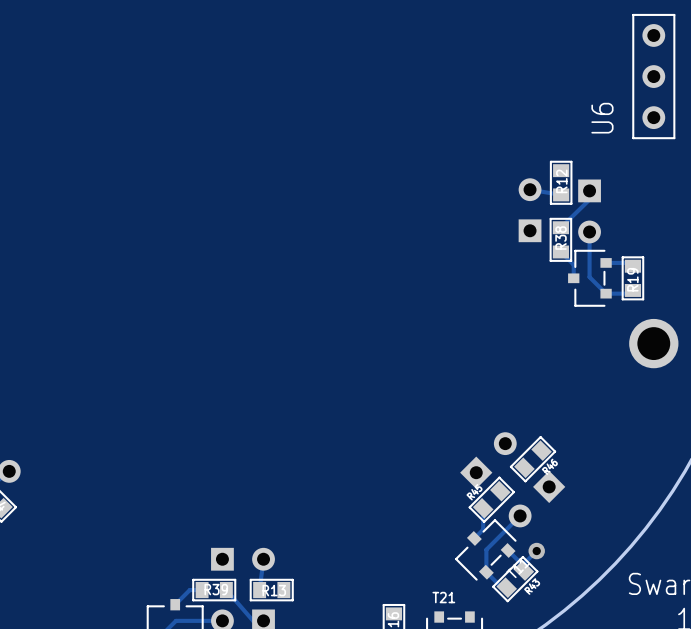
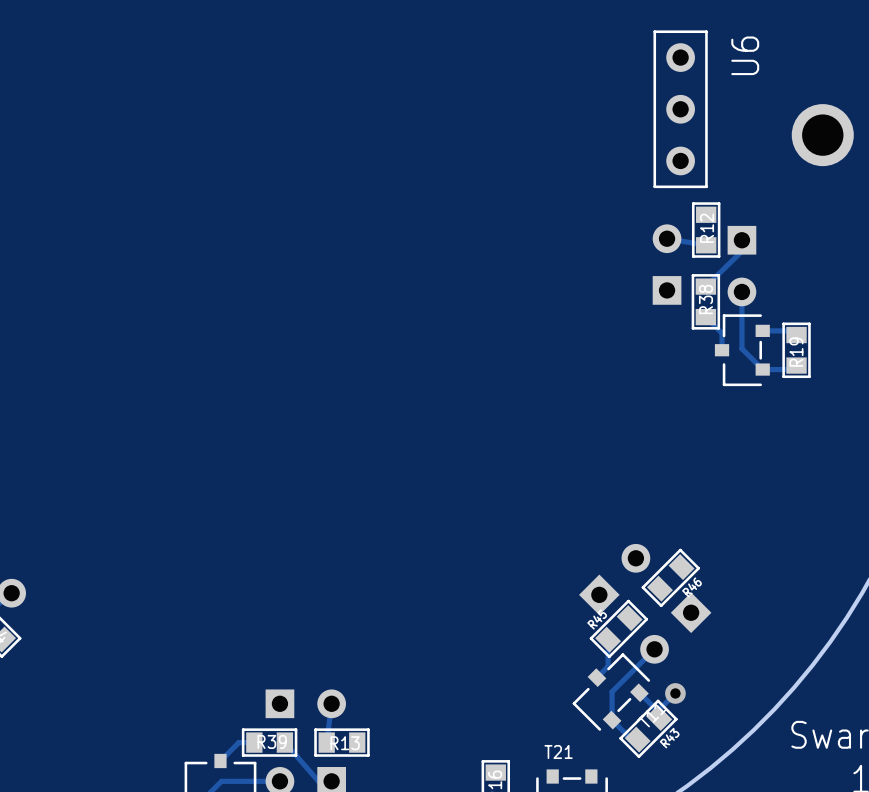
U6 position: (653, 76) -> (680, 109)
U6 name position: U6 (602, 118) -> U6 (745, 55)
part position: (653, 343) -> (822, 135)

